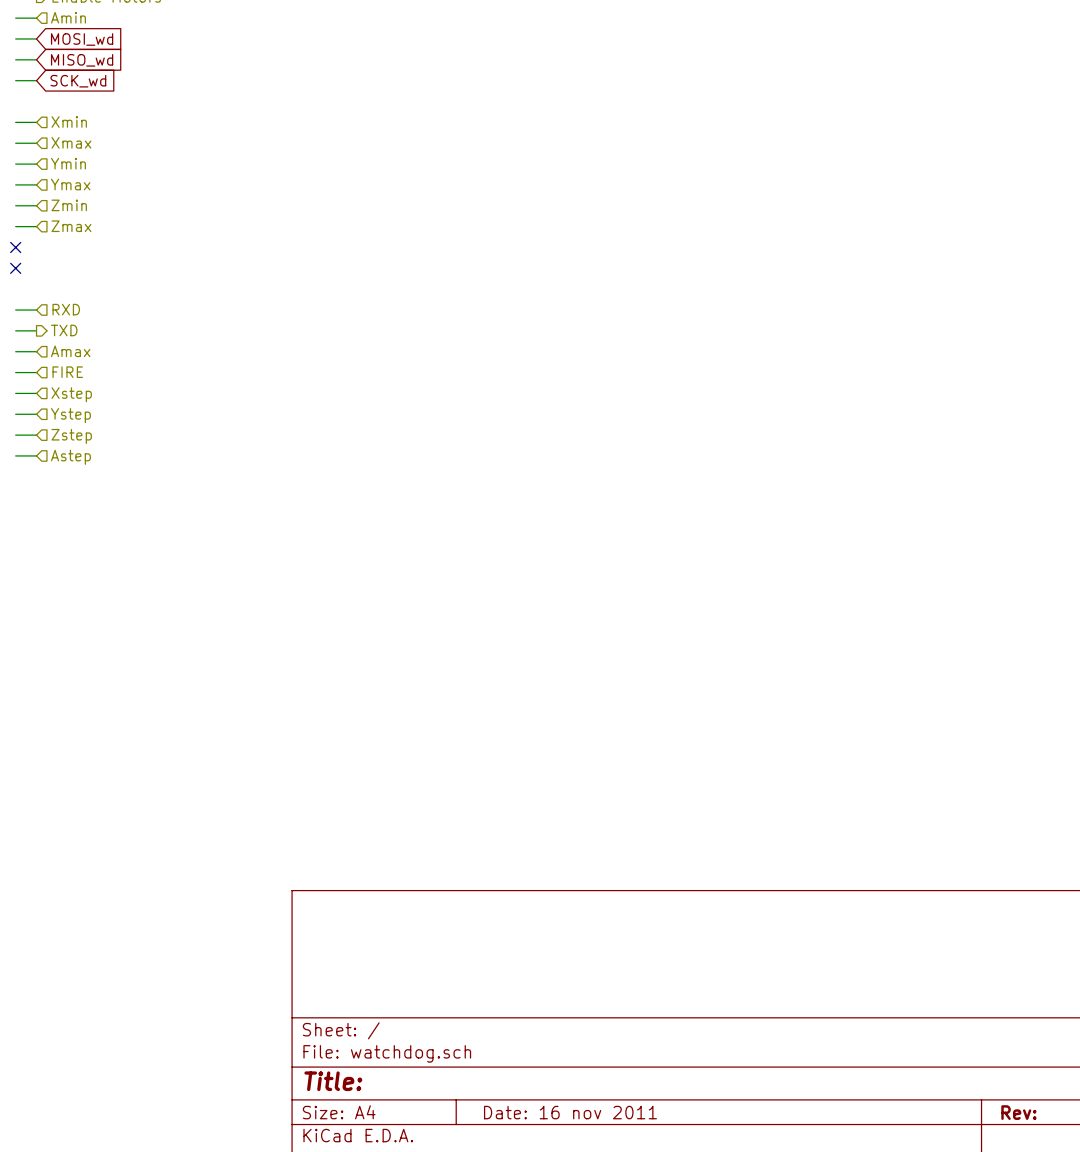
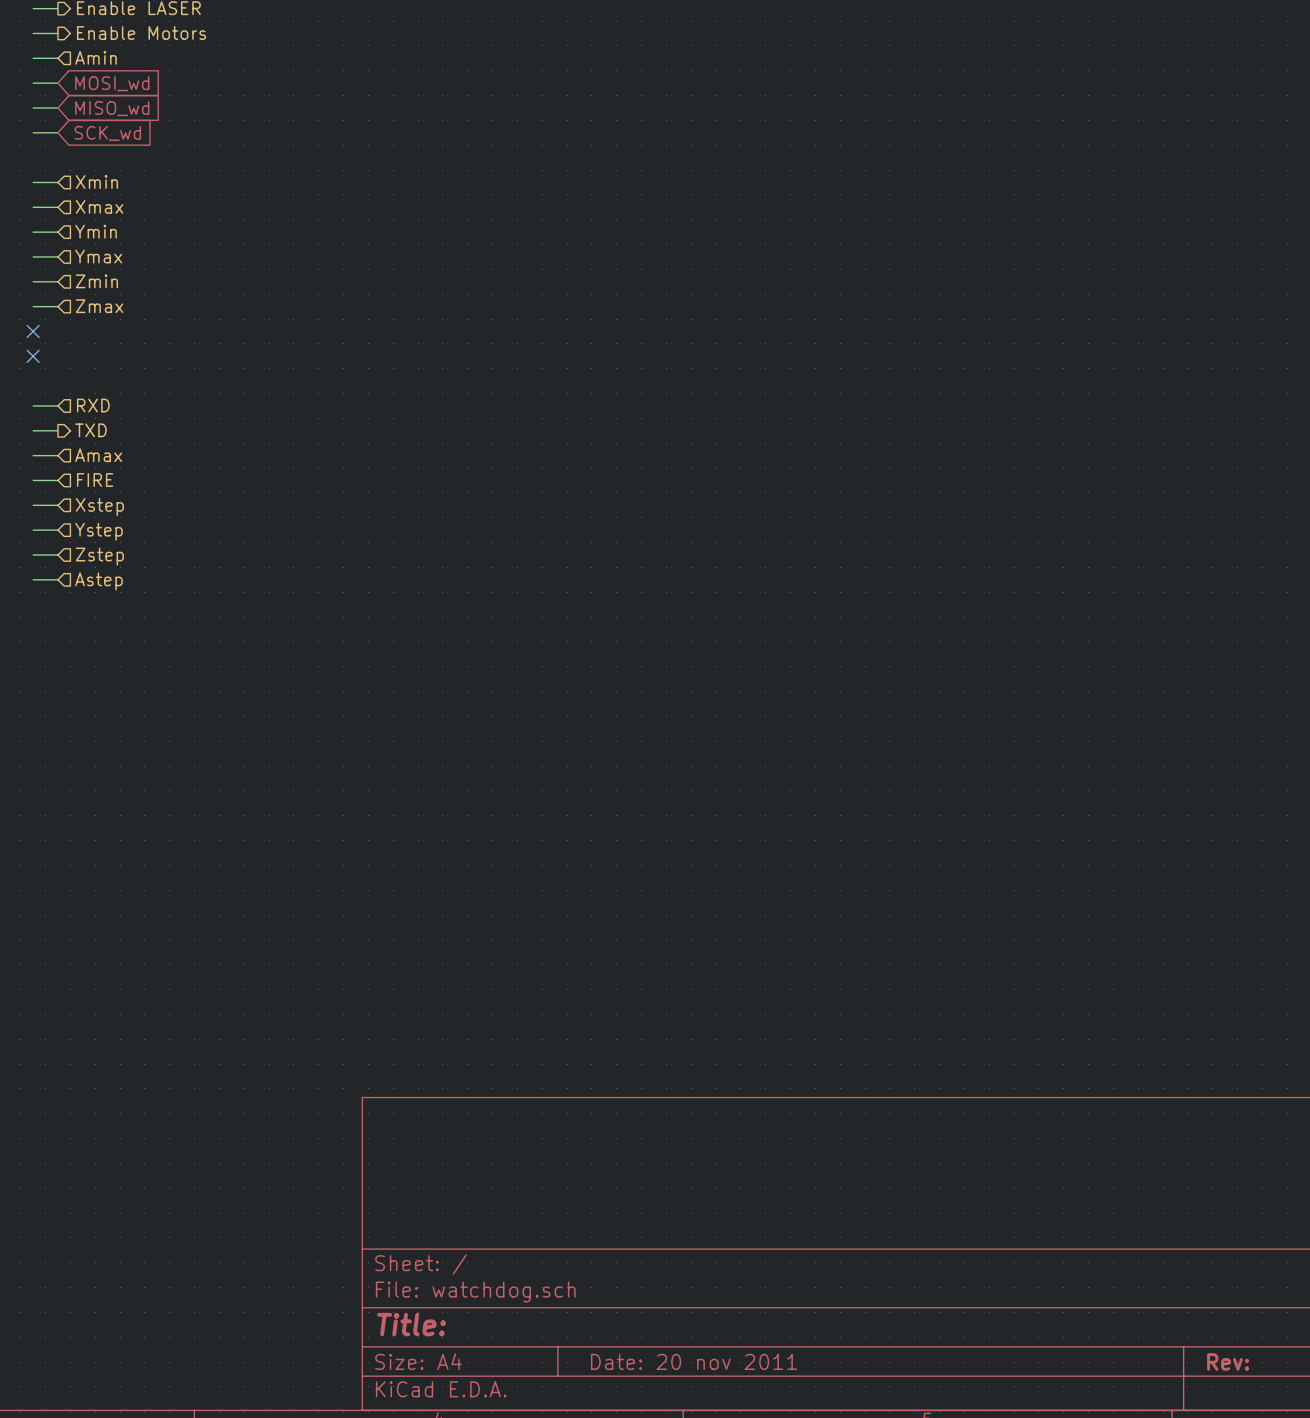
title block: Date: 16 nov 2011 (570, 1112) -> Date: 20 nov 2011 (693, 1361)

